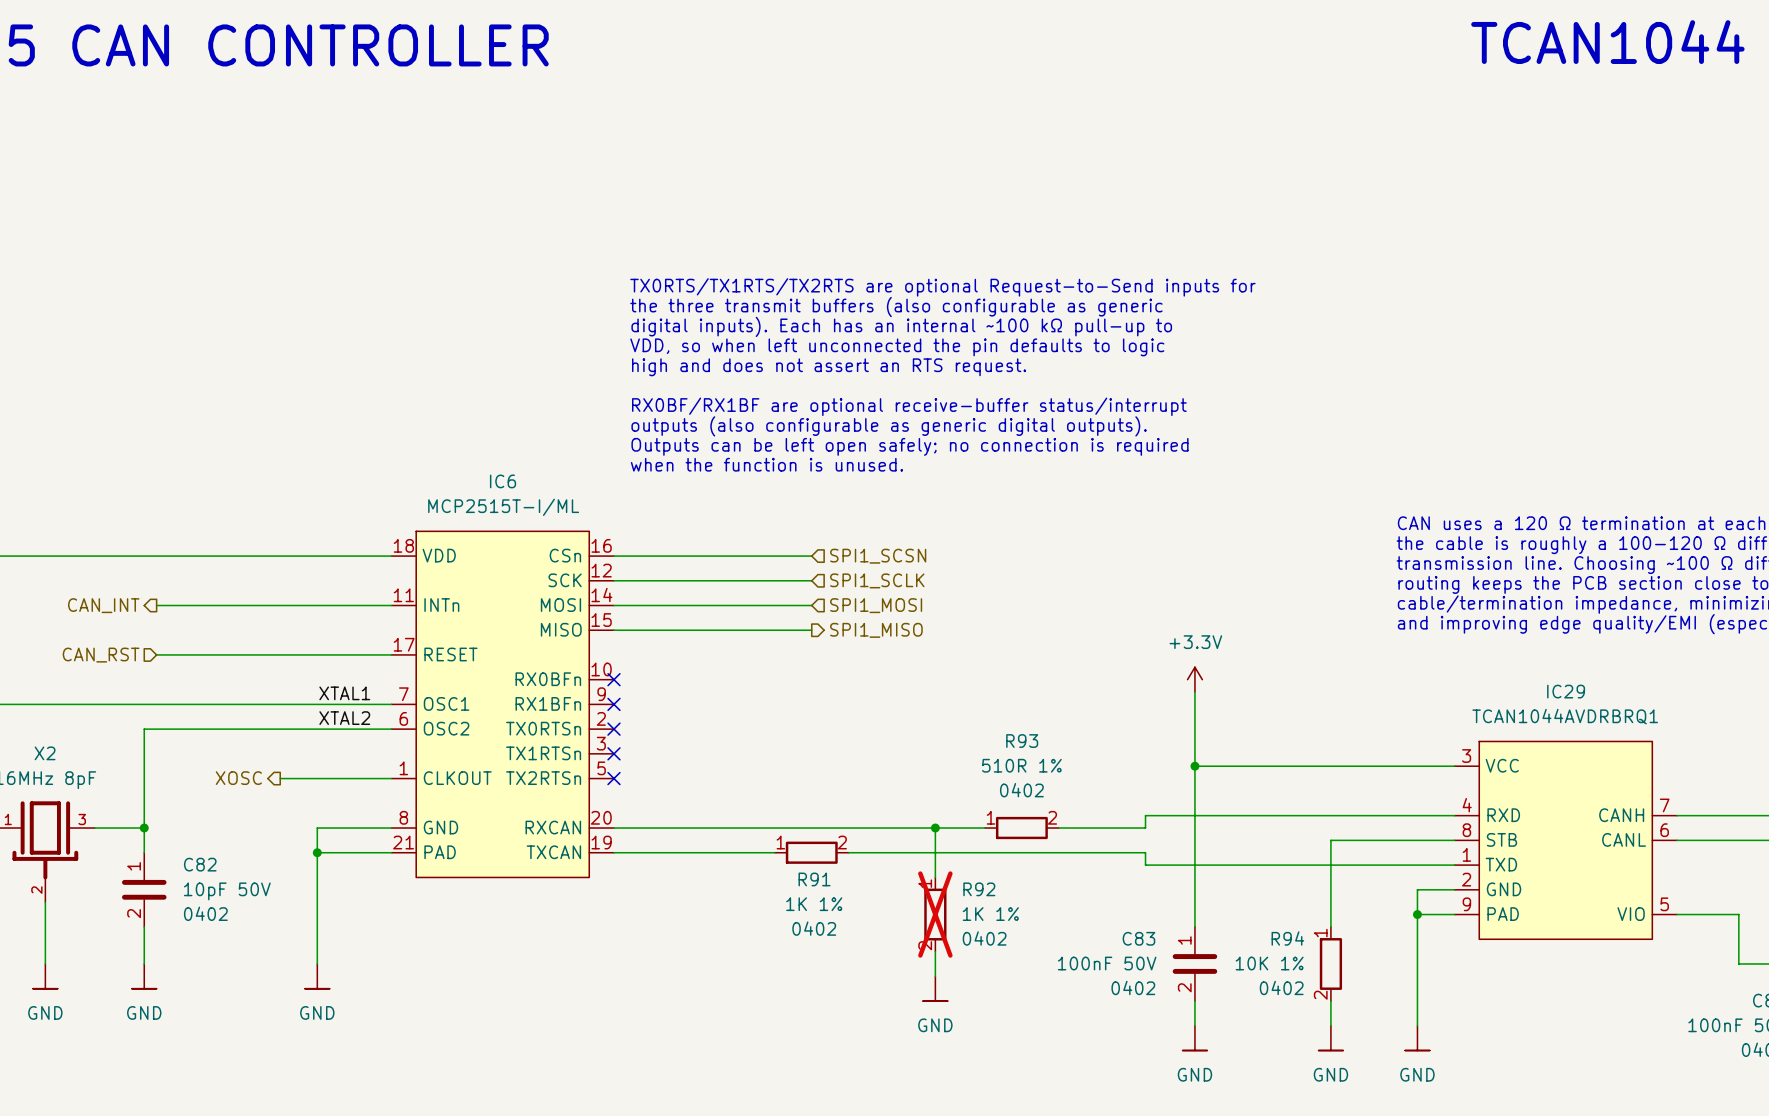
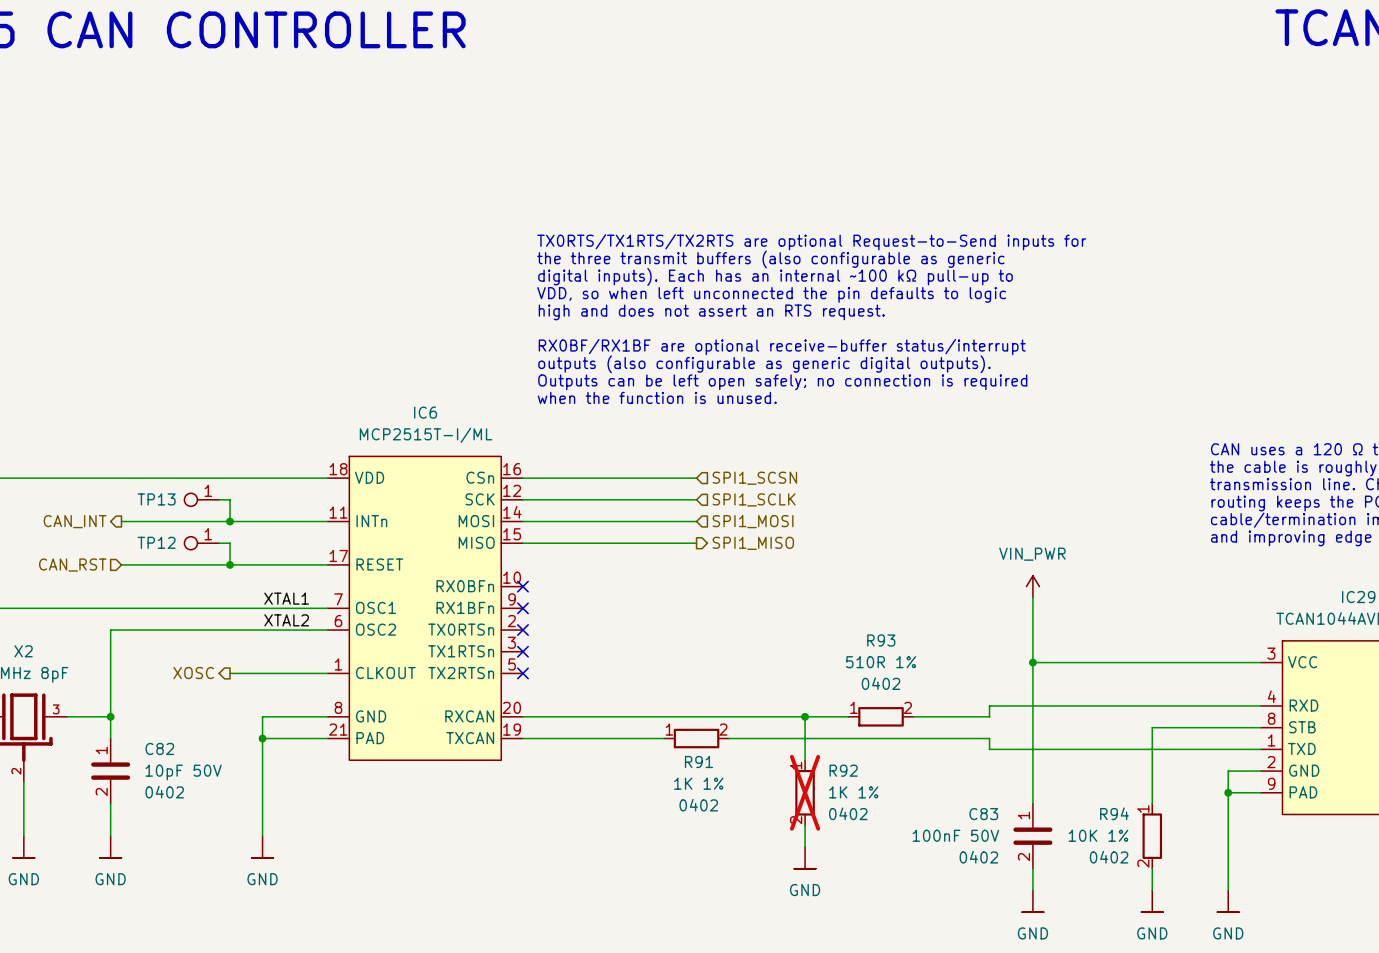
TP13: none -> (201, 499)
wire: none -> (219, 499) (230, 499) (230, 521)
junction: none -> (230, 521)
TP12: none -> (201, 543)
wire: none -> (219, 543) (230, 543) (230, 564)
junction: none -> (230, 564)
power symbol: +3.3V (1194, 679) -> VIN_PWR (1032, 586)

